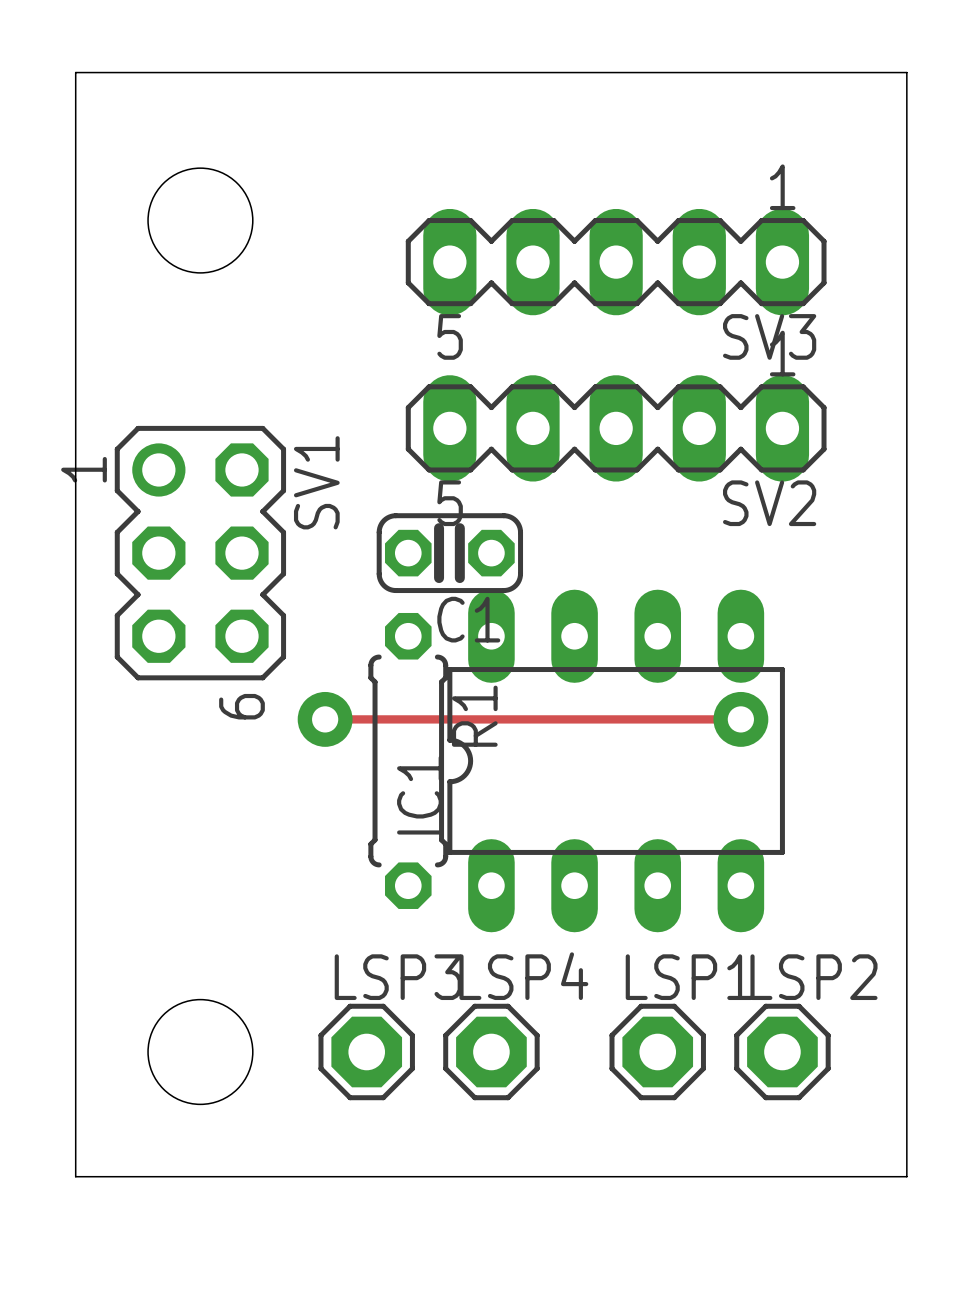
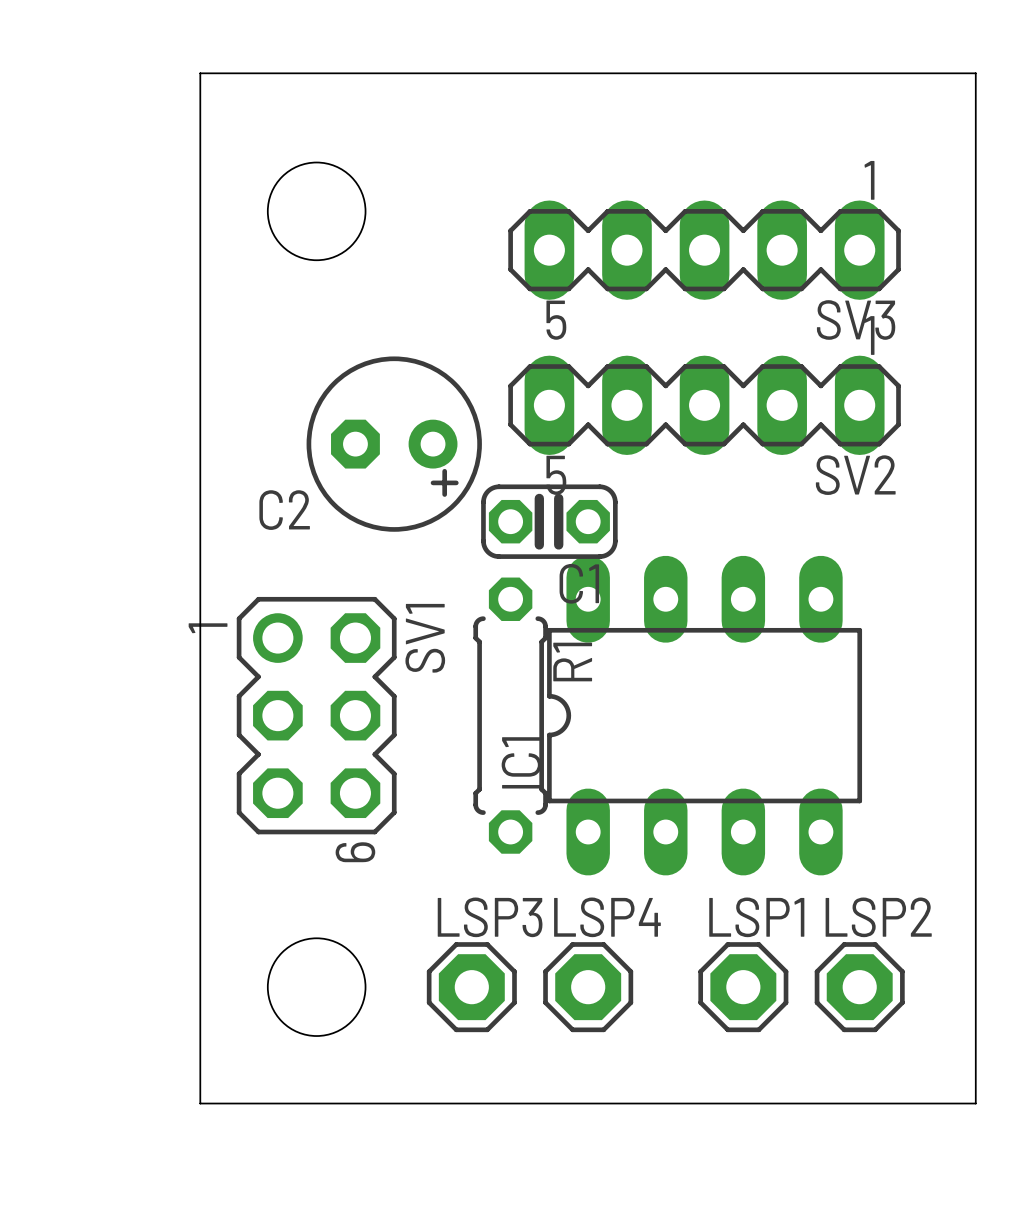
C2: none -> (394, 444)
SV1 position: (200, 553) -> (316, 715)
track: (325, 719) (740, 719) -> none
via: (325, 719) -> none
via: (740, 719) -> none

